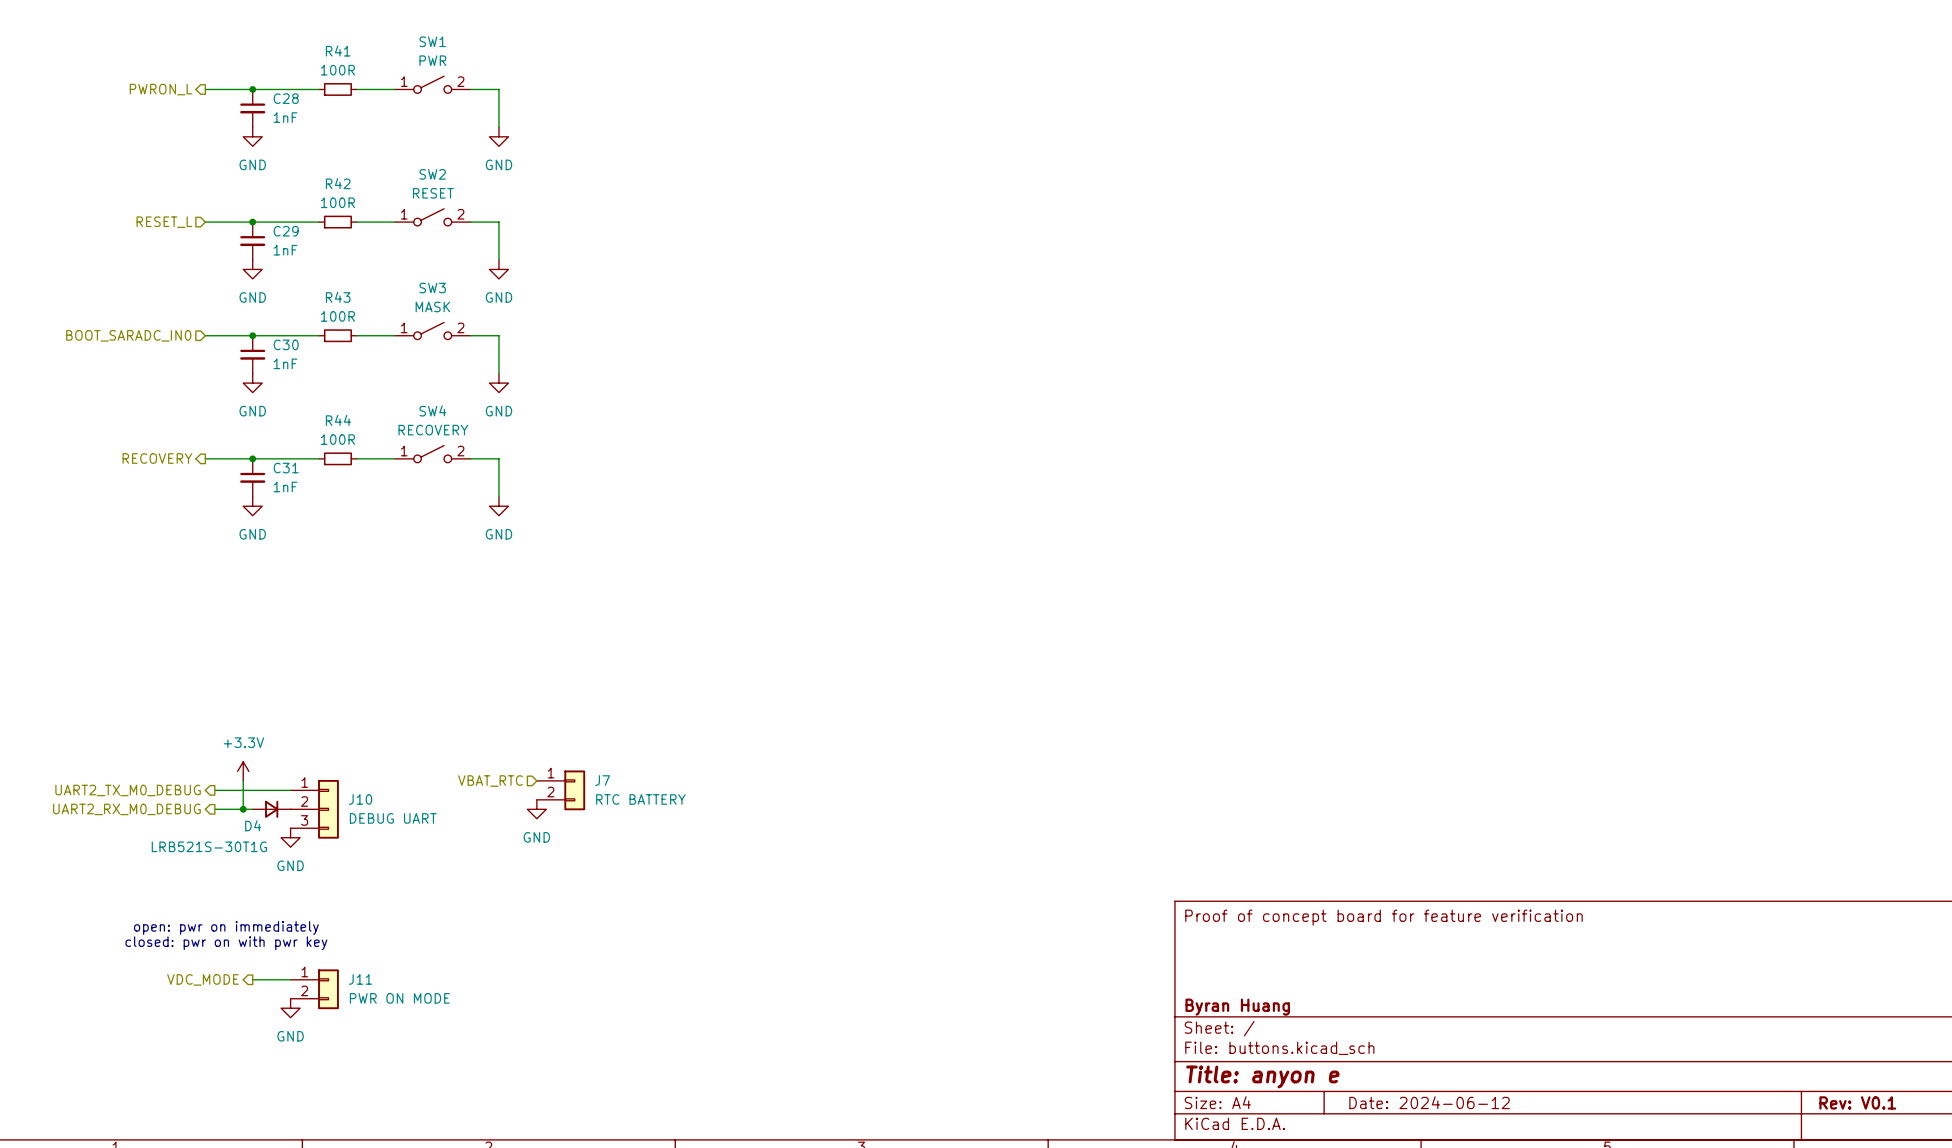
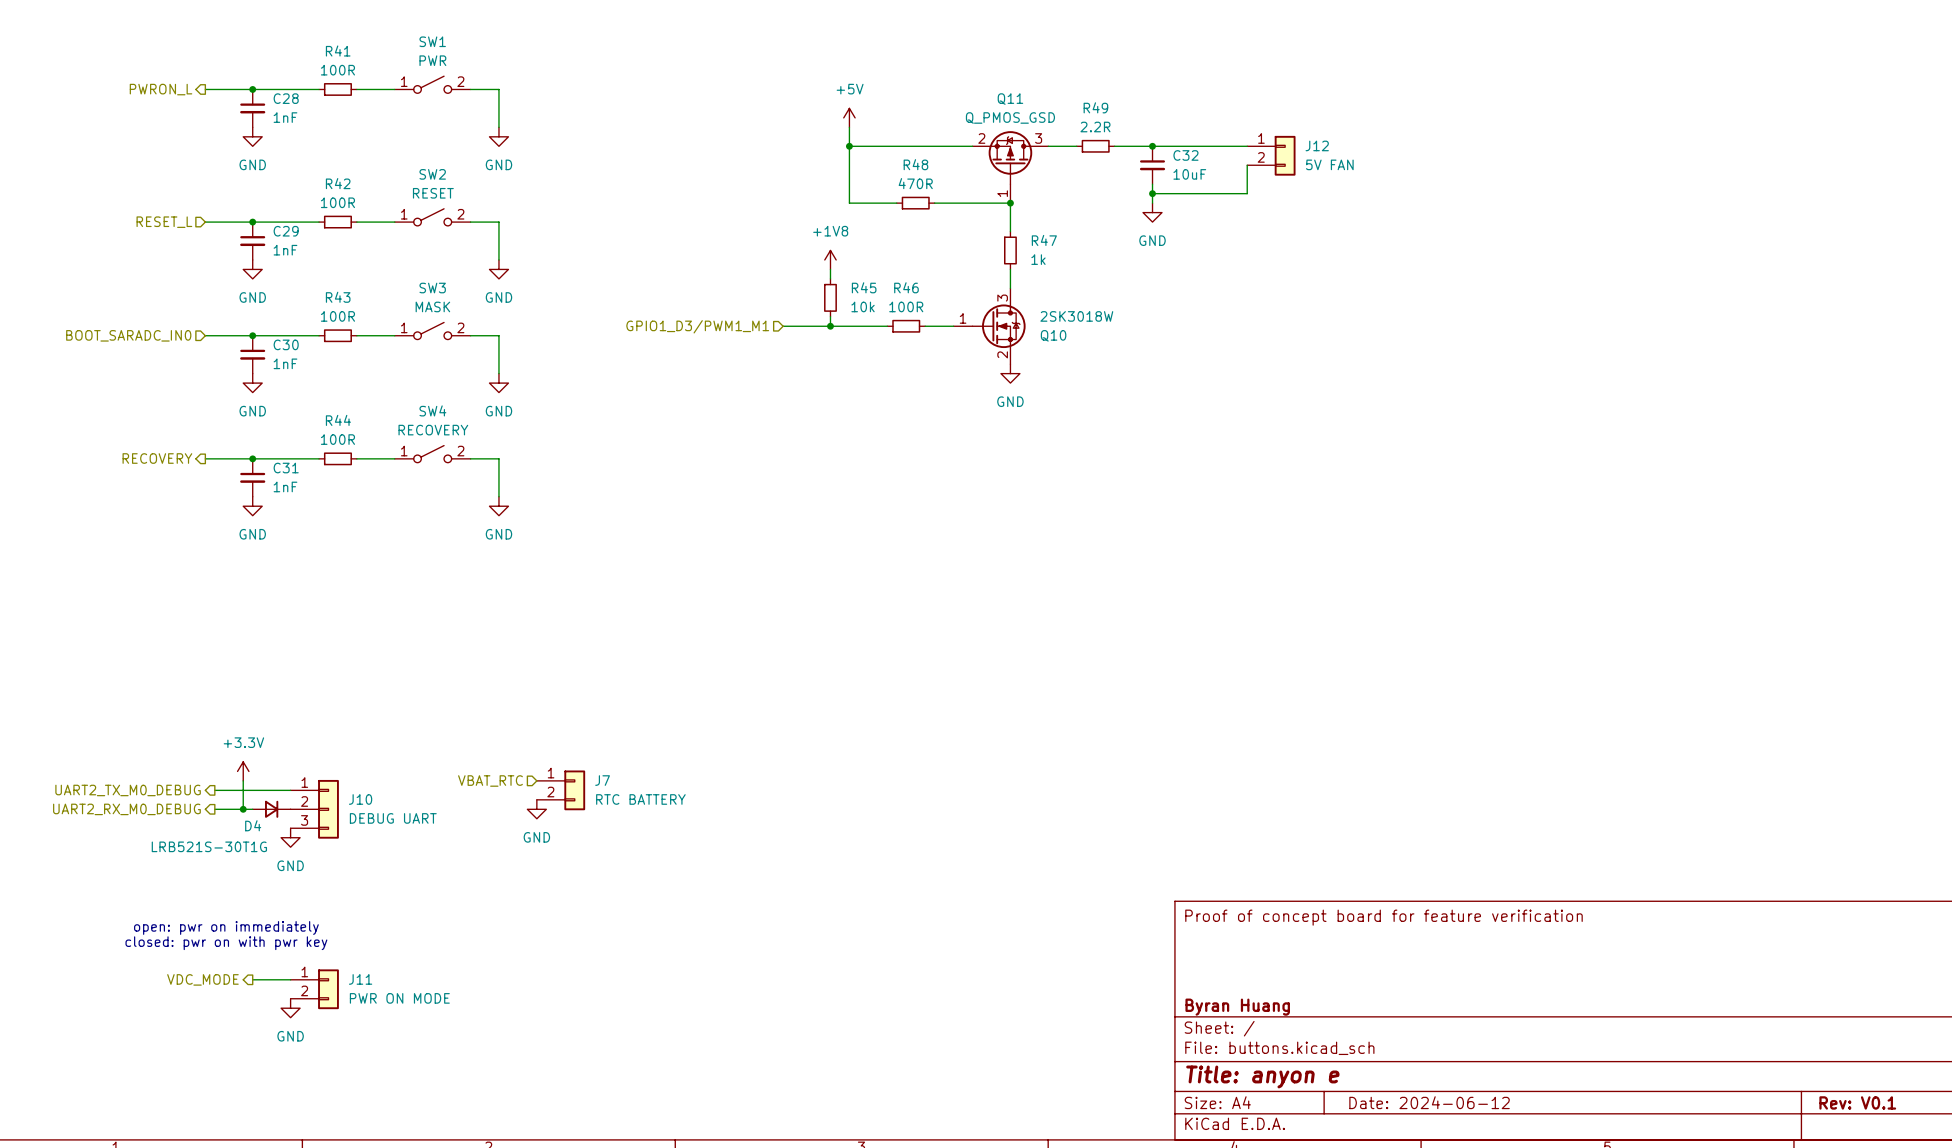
power symbol: none -> +5V (849, 117)
wire: none -> (849, 127) (849, 203) (896, 203)
wire: none -> (849, 146) (972, 146)
junction: none -> (849, 146)
wire: none -> (1048, 146) (1076, 146)
R49: none -> 2.2R (1095, 146)
wire: none -> (1114, 146) (1247, 146)
junction: none -> (1152, 146)
J12: none -> 5V FAN (1271, 155)
C32: none -> 10uF (1152, 165)
wire: none -> (1247, 165) (1247, 193) (1152, 193)
Q11: none -> Q_PMOS_GSD (1010, 167)
wire: none -> (1152, 184) (1152, 203)
junction: none -> (1152, 193)
R48: none -> 470R (915, 203)
wire: none -> (934, 203) (1010, 203) (1010, 231)
junction: none -> (1010, 203)
power symbol: none -> GND (1152, 212)
R47: none -> 1k (1010, 250)
power symbol: none -> +1V8 (830, 259)
wire: none -> (830, 269) (830, 278)
wire: none -> (1010, 269) (1010, 288)
R45: none -> 10k (830, 297)
wire: none -> (830, 316) (830, 326)
hierarchical label: none -> GPIO1_D3/PWM1_M1 (697, 326)
wire: none -> (783, 326) (887, 326)
junction: none -> (830, 326)
R46: none -> 100R (906, 326)
wire: none -> (925, 326) (953, 326)
Q10: none -> 2SK3018W (989, 326)
power symbol: none -> GND (1010, 373)

